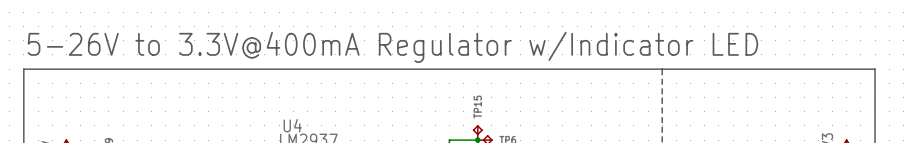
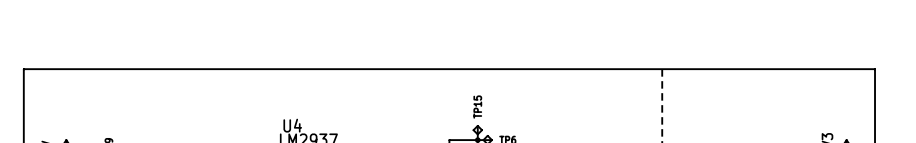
text: 5-26V to 3.3V@400mA Regulator w/Indicator LED (392, 47) -> none

